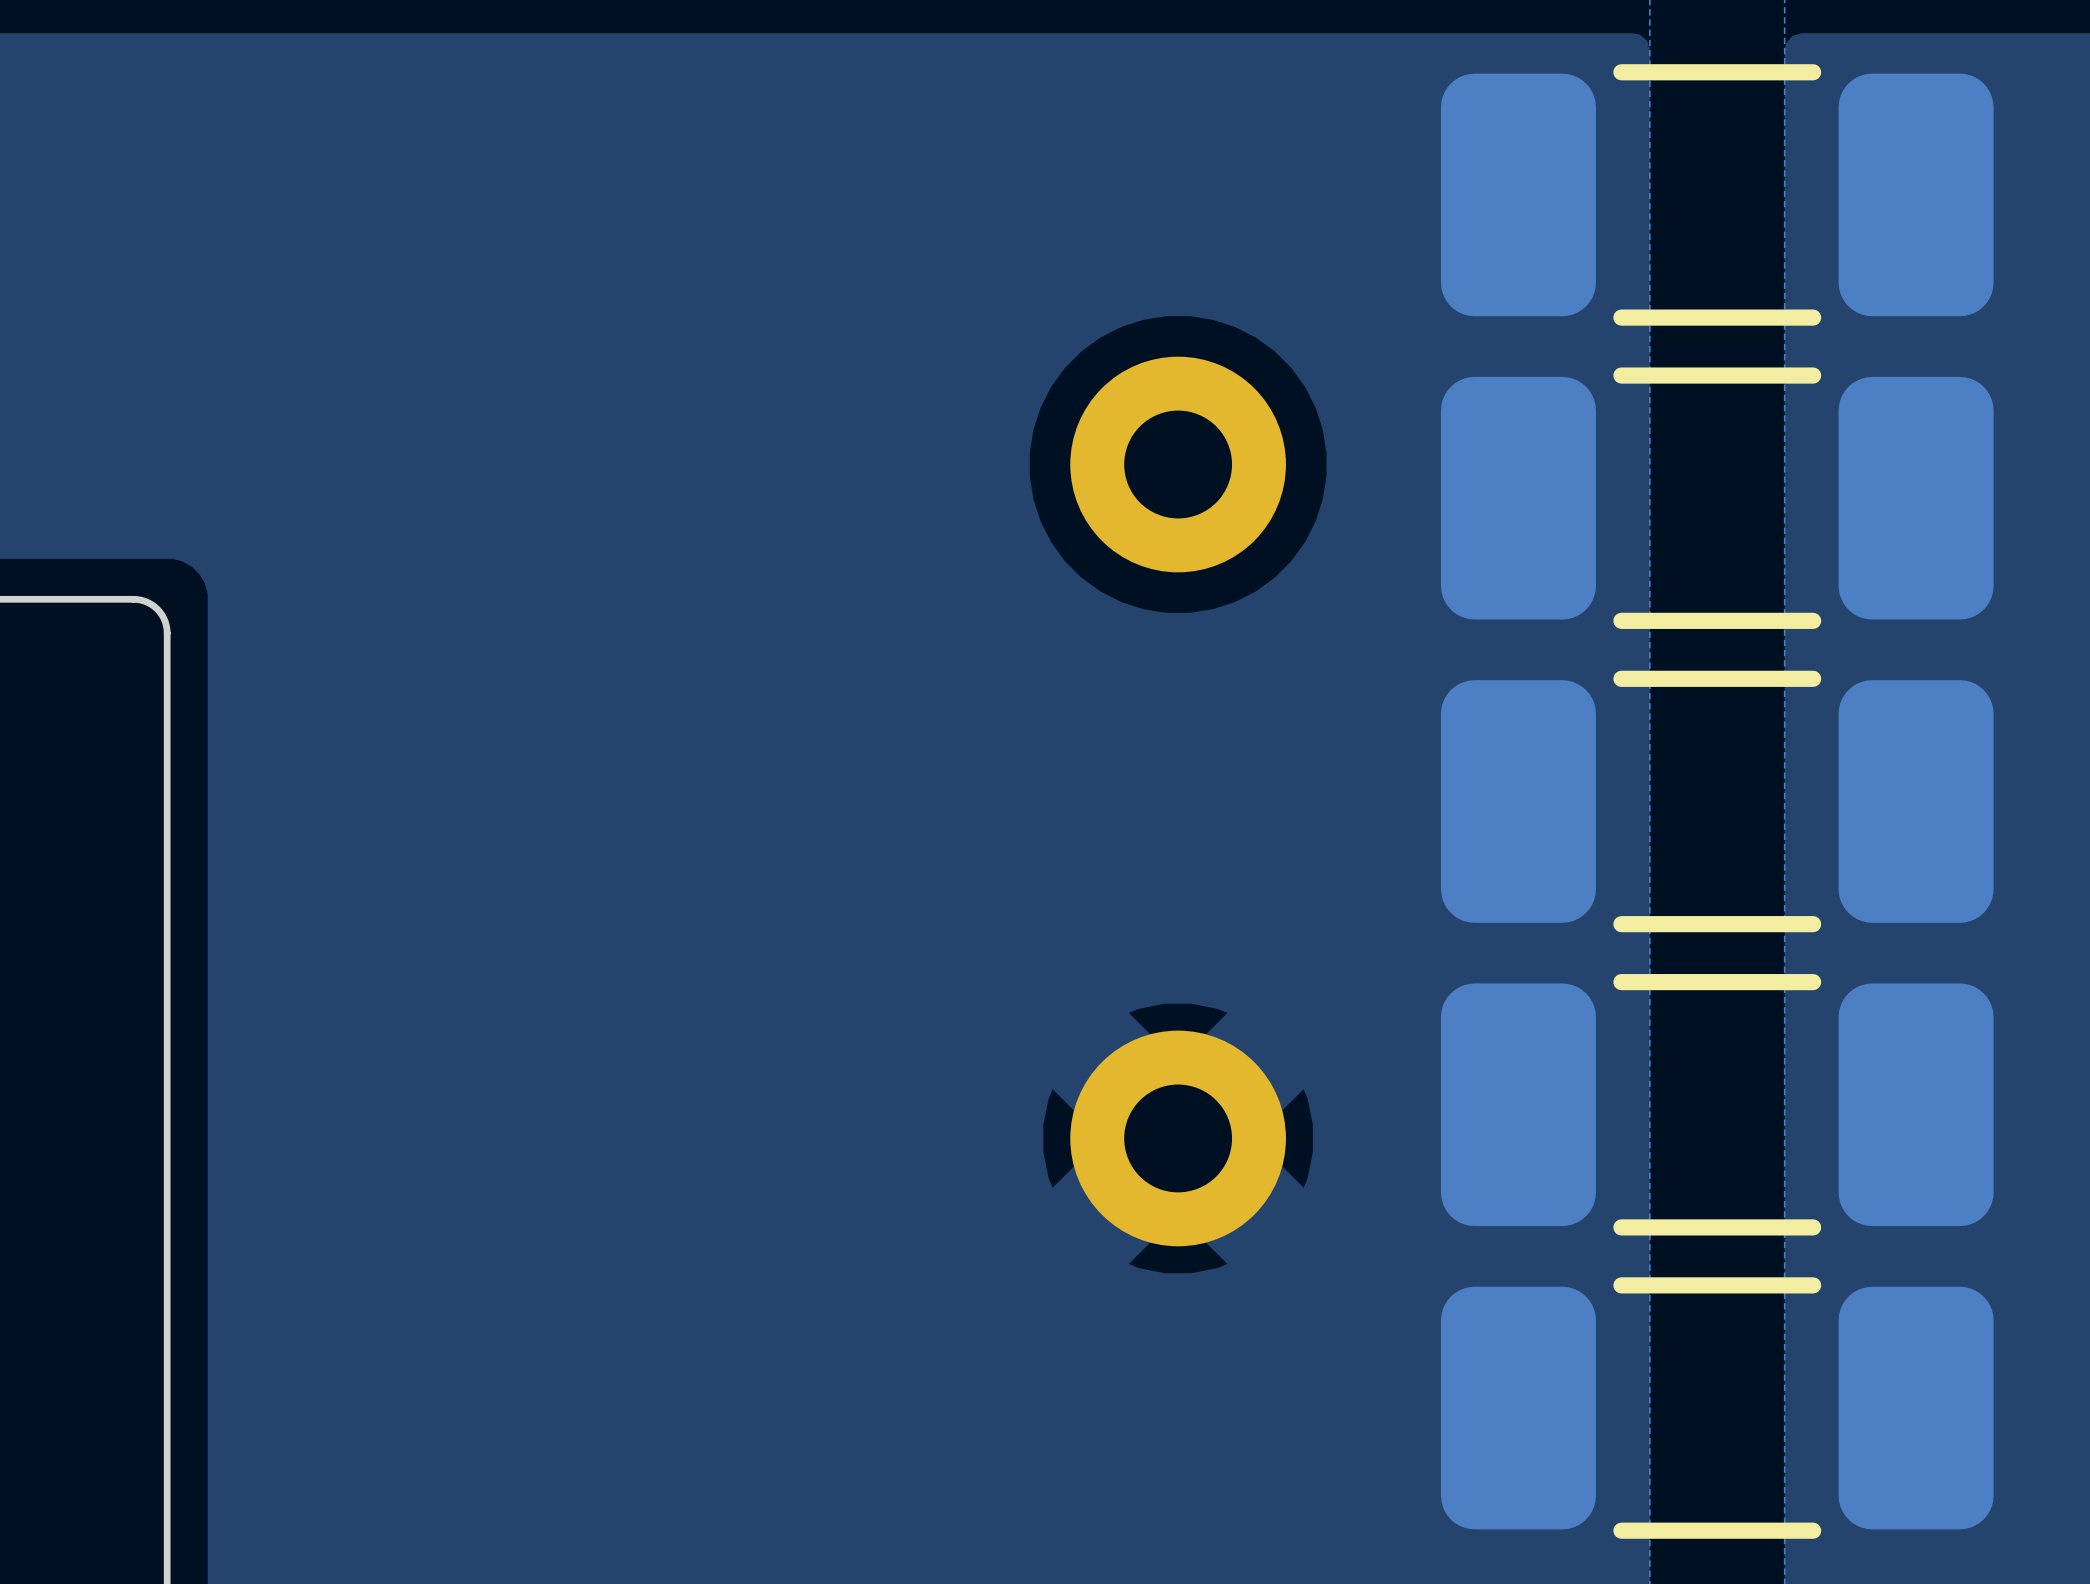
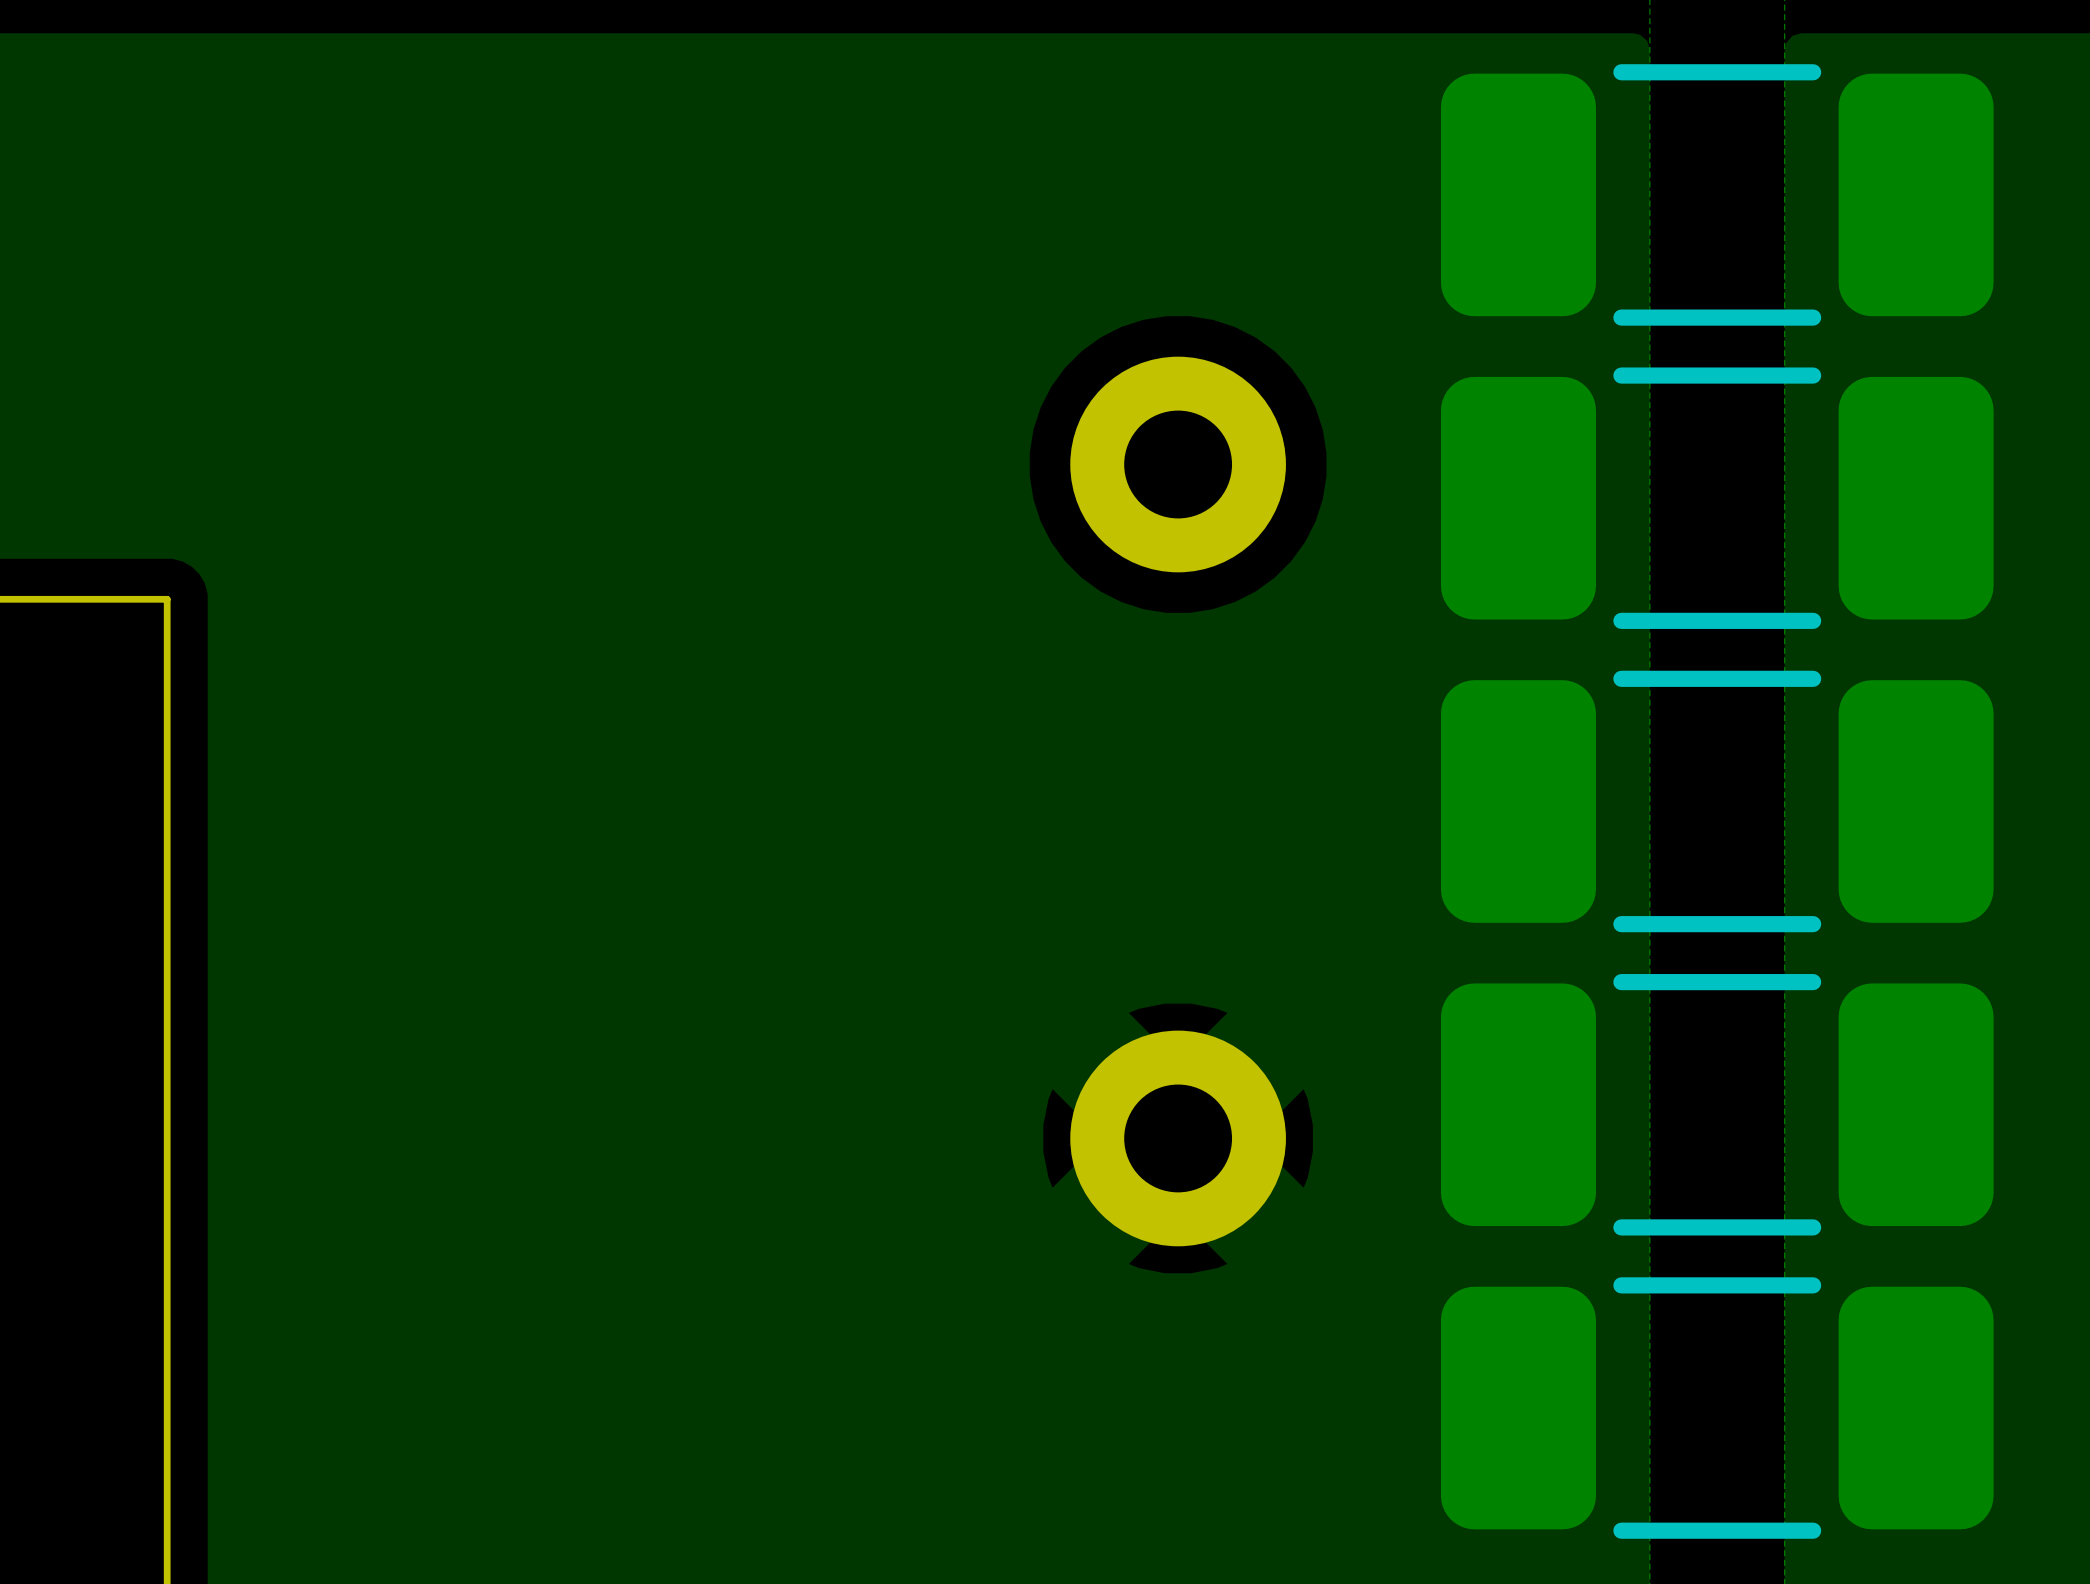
board edge: (133, 599) (144, 601) (157, 609) (163, 618) (167, 633) -> (133, 599) (167, 599) (167, 633)

